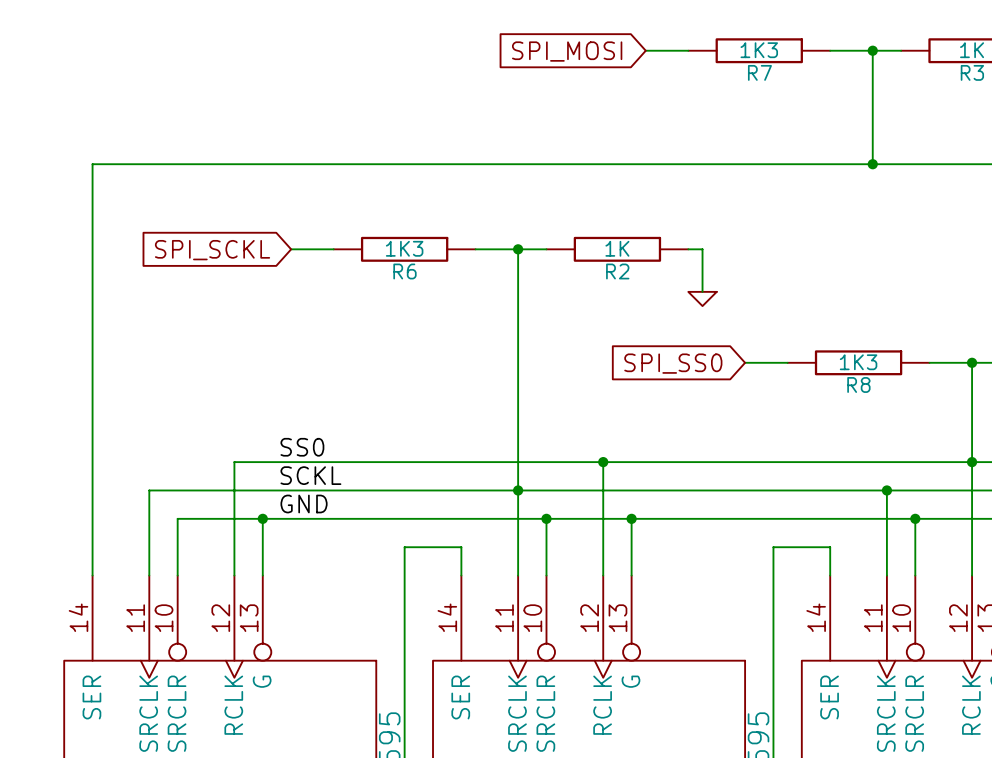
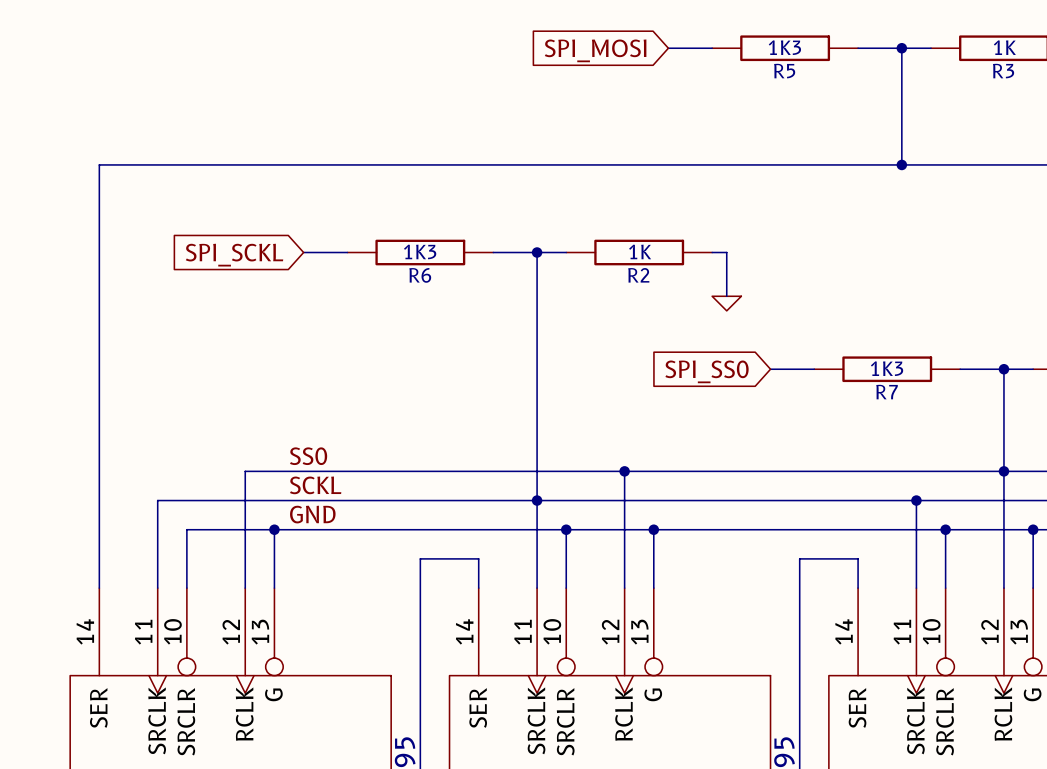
R7 name: R7 (759, 72) -> R5 (784, 71)
R8 name: R8 (858, 384) -> R7 (887, 392)

